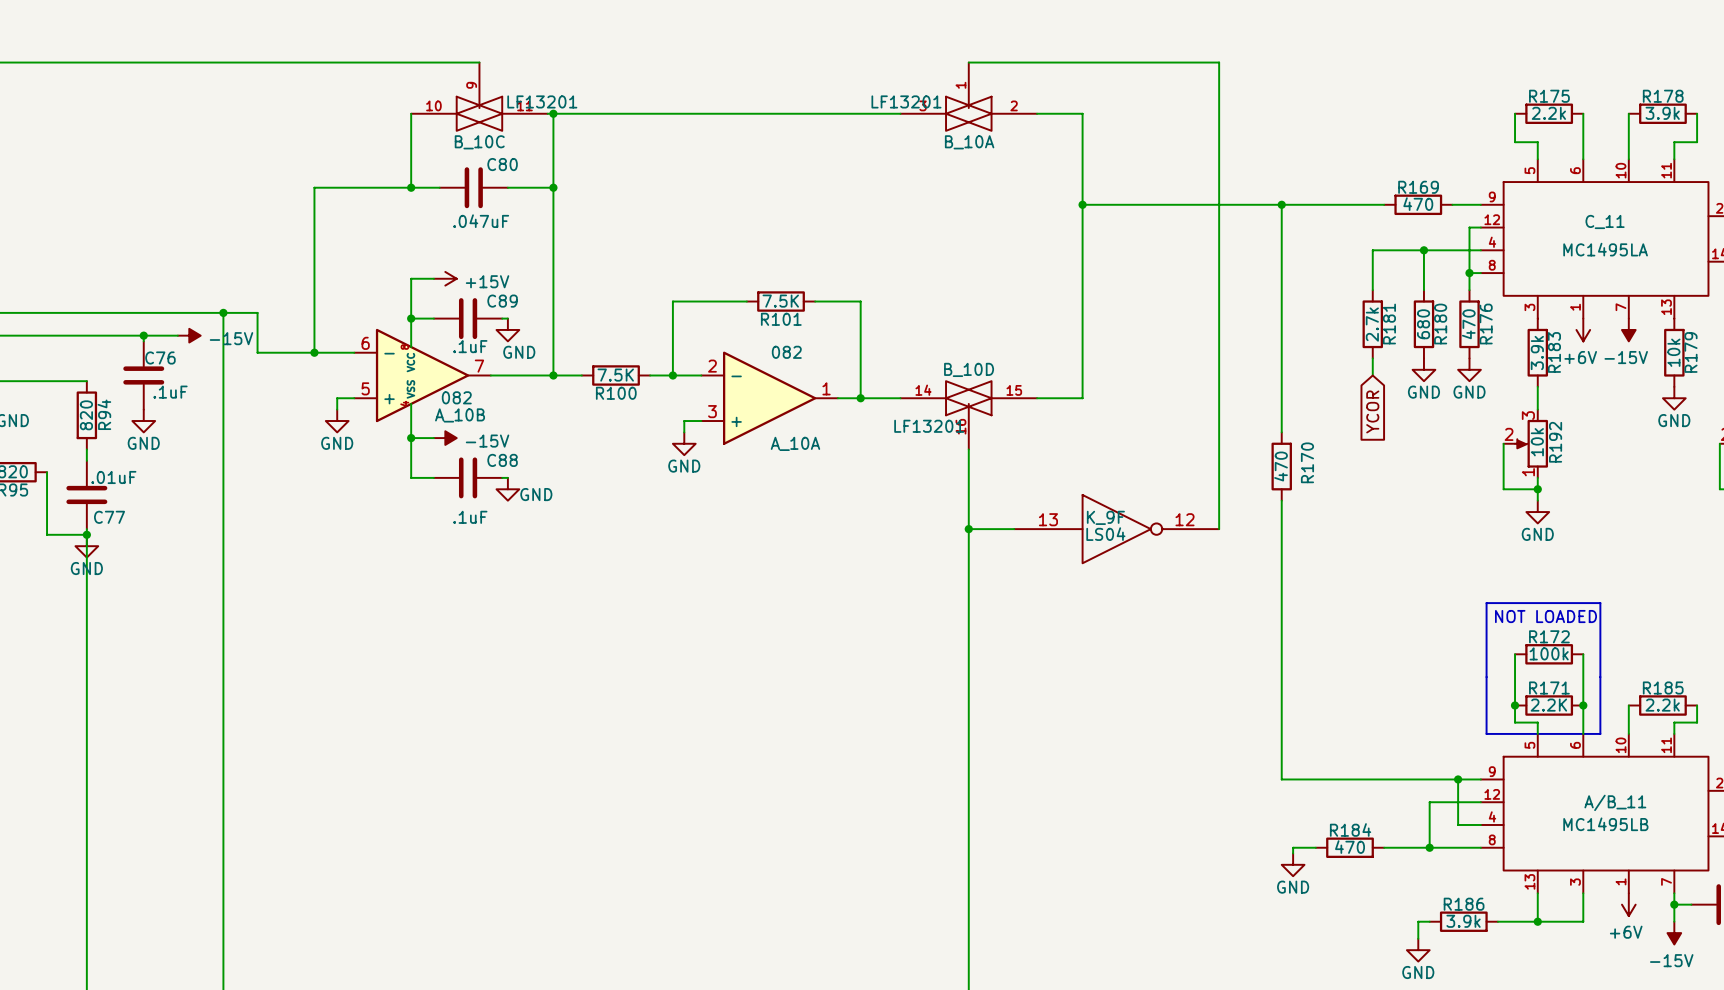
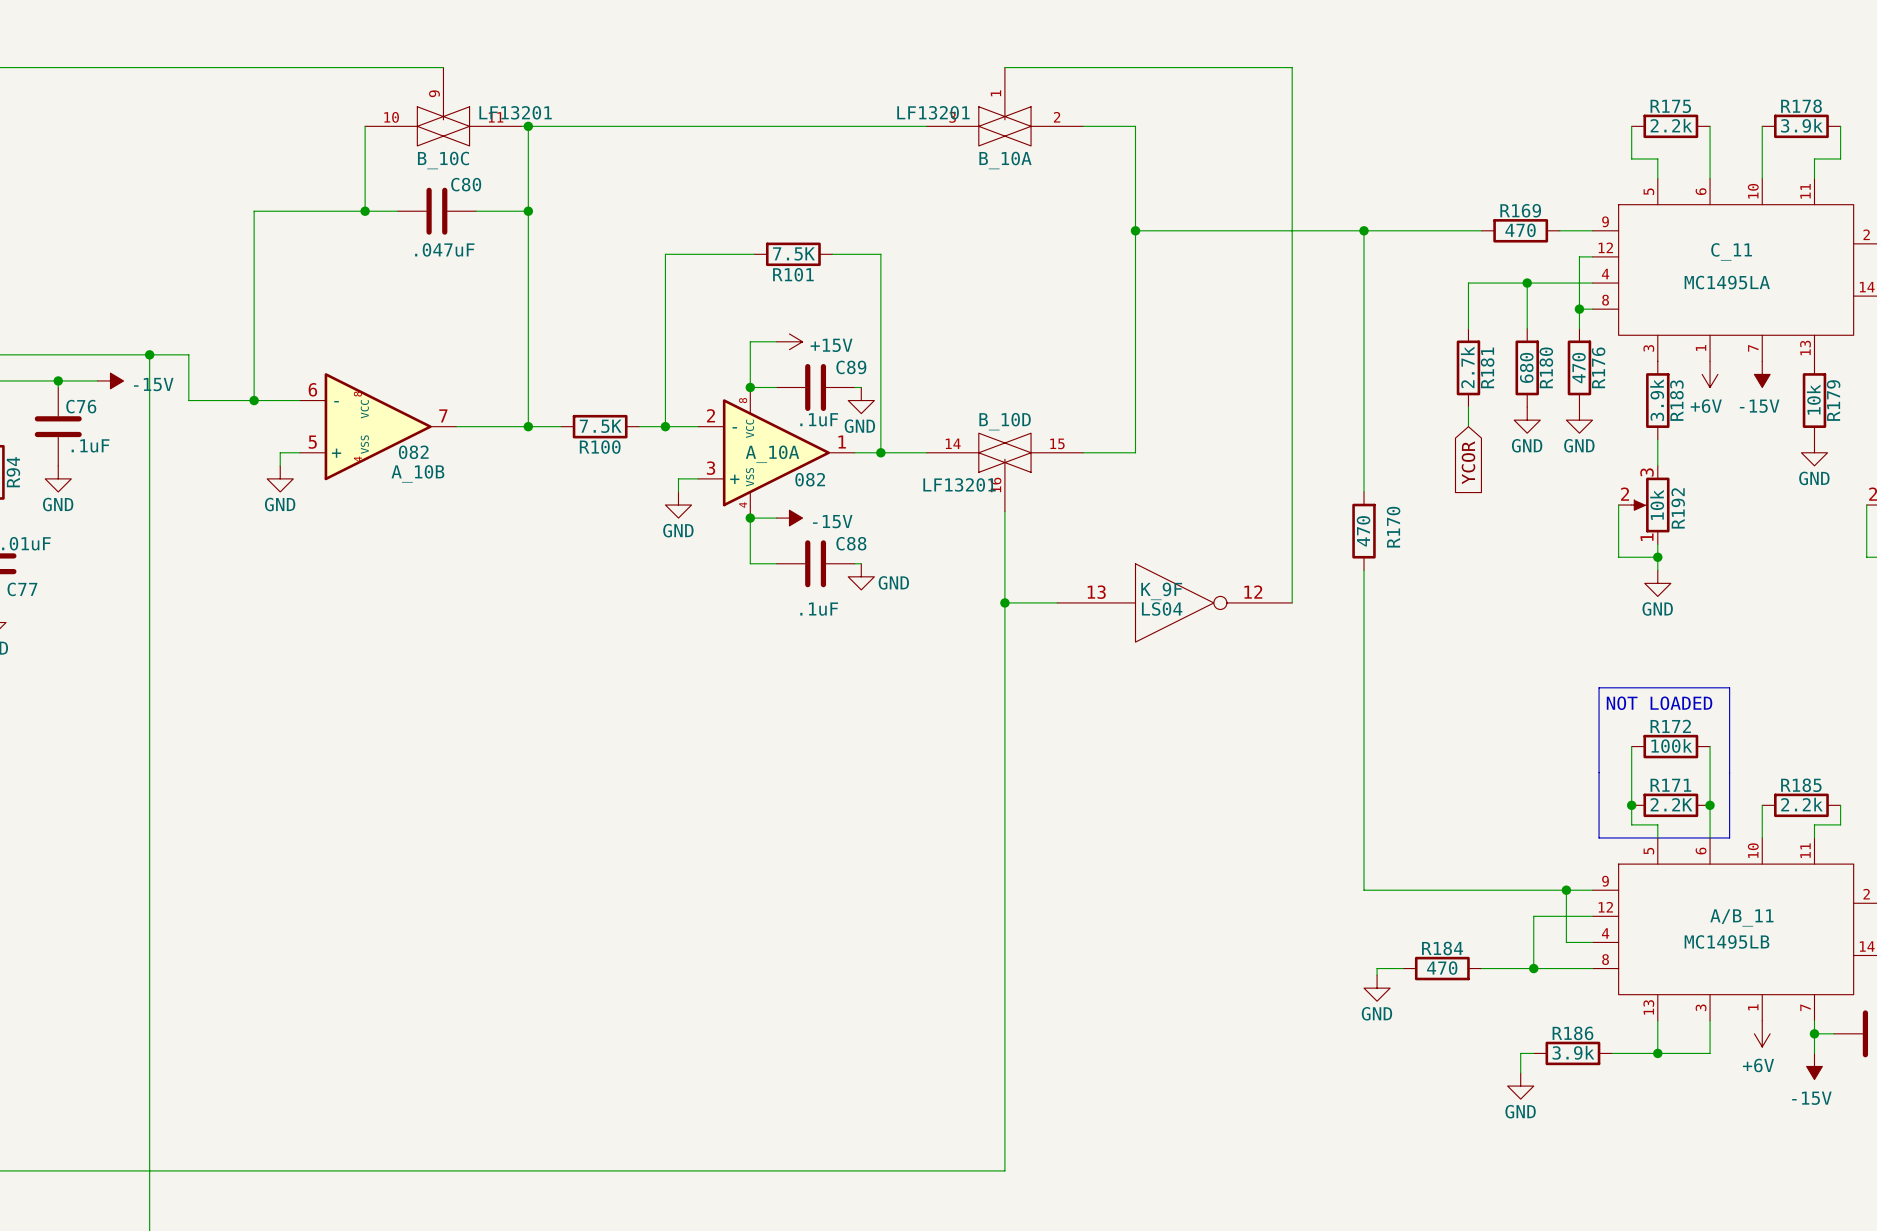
wire: (433, 278) (411, 278) (411, 347) -> none
power symbol: +15V (445, 278) -> none
wire: (672, 301) (746, 301) -> (665, 341) (665, 254) (754, 254)
wire: none -> (776, 341) (750, 341) (750, 387) (776, 387)
power symbol: none -> +15V (789, 341)
R101 position: (781, 301) -> (793, 254)
wire: (815, 301) (860, 301) -> (832, 254) (880, 254) (880, 341)
wire: (411, 318) (433, 318) -> none
junction: (411, 318) -> none
C89 position: (468, 318) -> (815, 387)
wire: (502, 318) (507, 318) -> none
power symbol: GND (507, 329) -> none
junction: none -> (750, 387)
wire: none -> (854, 387) (861, 387)
A_10A symbol: [701, 351, 838, 445] -> [698, 387, 855, 519]
A_10A value position: 082 (786, 352) -> 082 (810, 479)
power symbol: none -> GND (861, 400)
wire: (411, 403) (411, 477) (433, 477) -> none
wire: (411, 438) (433, 438) -> none
junction: (411, 438) -> none
power symbol: -15V (445, 438) -> none
A_10A name position: A_10A (795, 443) -> A_10A (772, 454)
junction: none -> (750, 518)
wire: none -> (776, 518) (750, 518) (750, 563) (776, 563)
power symbol: none -> -15V (789, 518)
C88 position: (468, 477) -> (815, 563)
wire: (502, 477) (507, 477) -> none
power symbol: GND (507, 489) -> none
wire: none -> (854, 563) (861, 563)
power symbol: none -> GND (861, 576)

